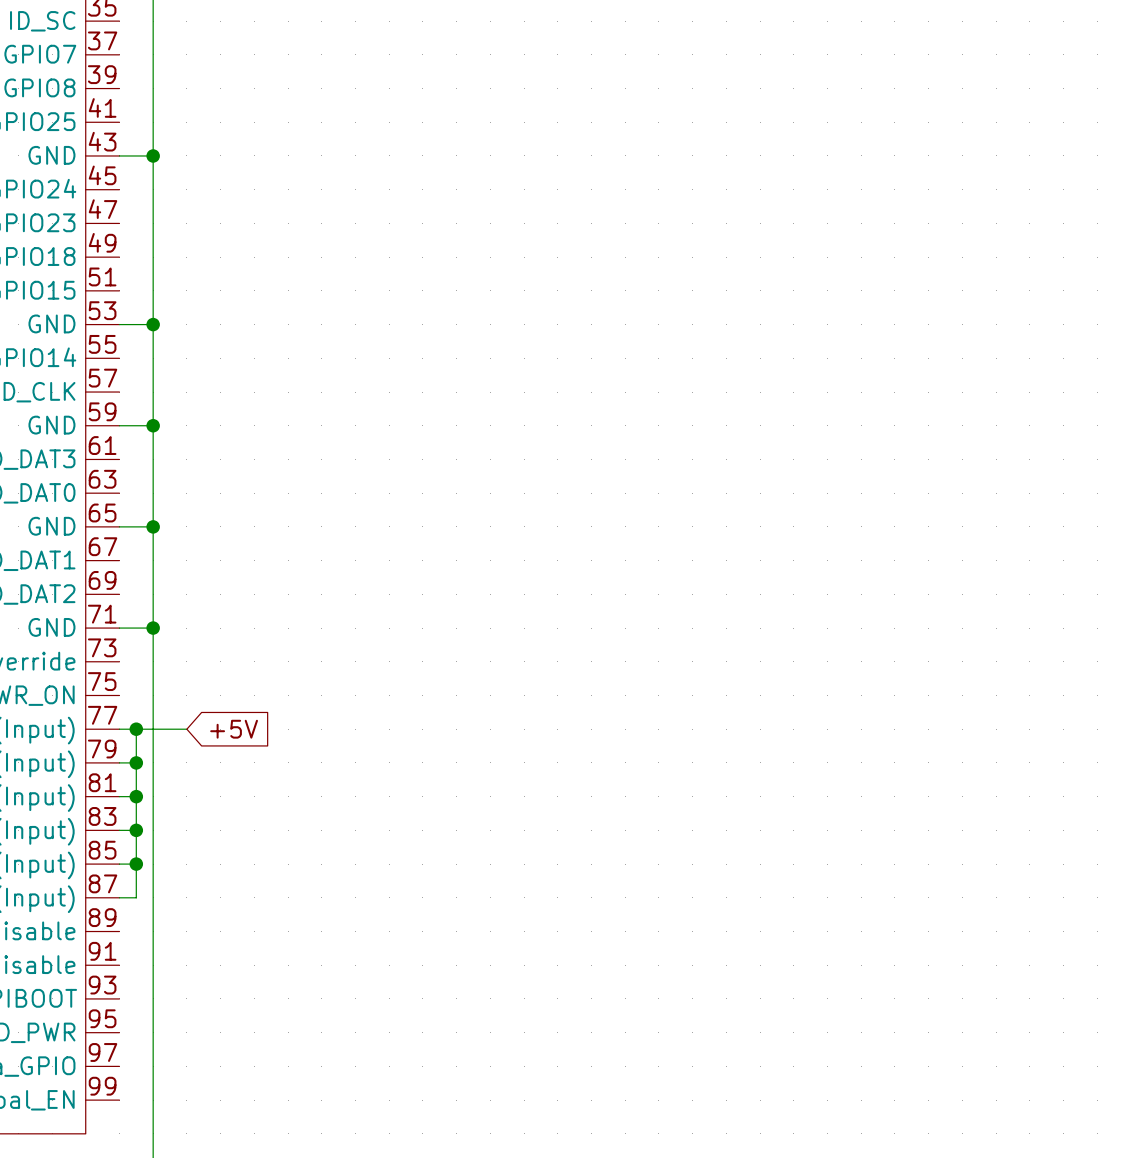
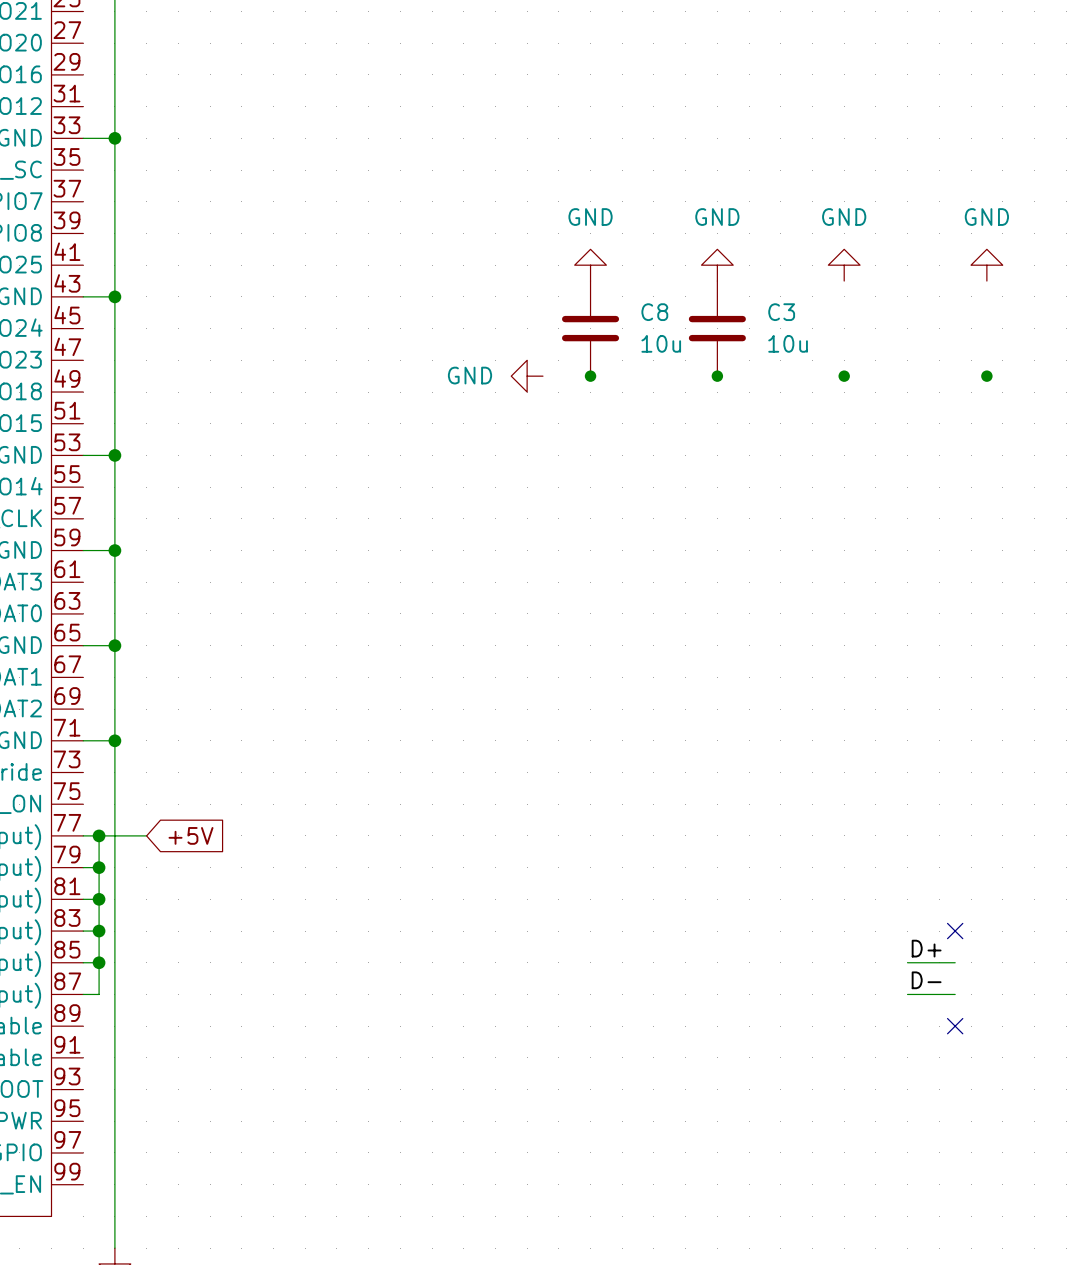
power symbol: none -> GND (590, 265)
power symbol: none -> GND (717, 265)
power symbol: none -> GND (844, 265)
power symbol: none -> GND (986, 265)
C8: none -> 10u (590, 328)
C3: none -> 10u (717, 328)
power symbol: none -> GND (527, 376)
junction: none -> (590, 376)
junction: none -> (717, 376)
junction: none -> (844, 376)
junction: none -> (986, 376)
no-connect mark: none -> (955, 931)
label: none -> D+ (926, 948)
wire: none -> (907, 962) (955, 962)
label: none -> D- (926, 980)
wire: none -> (907, 994) (955, 994)
no-connect mark: none -> (955, 1026)

